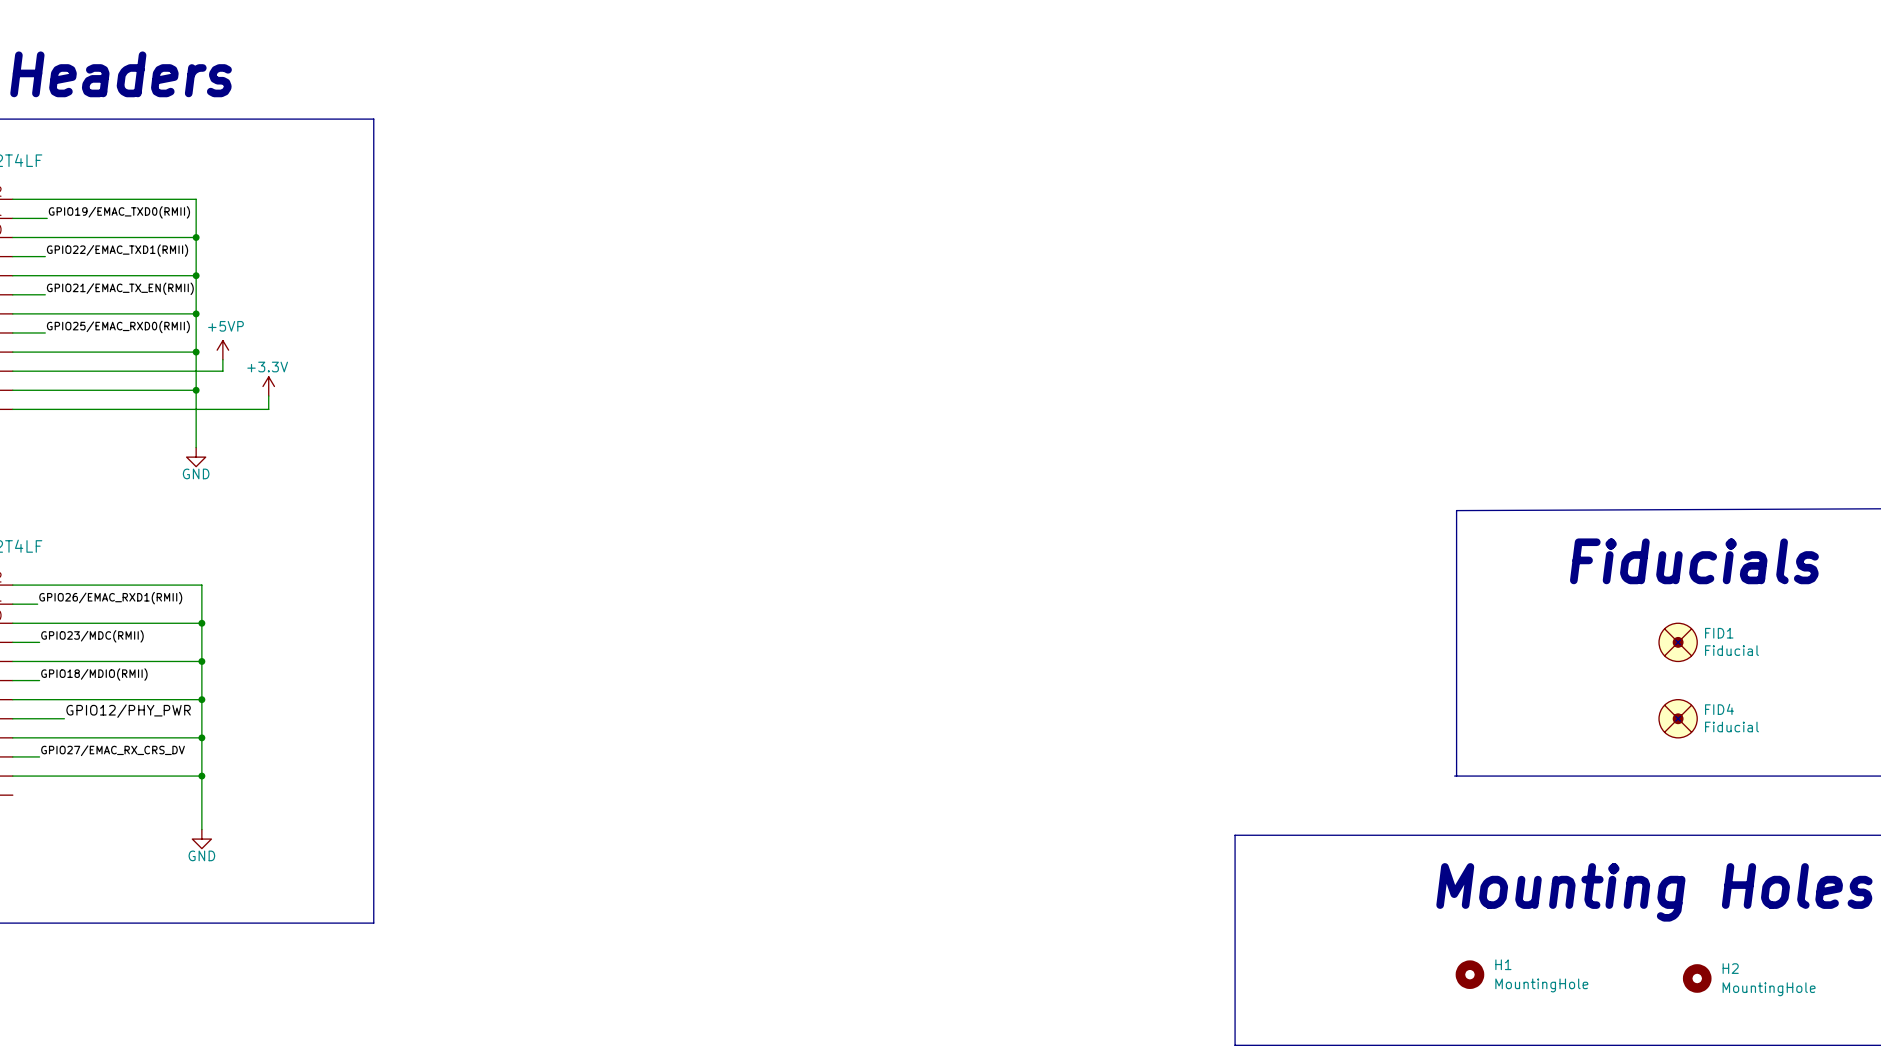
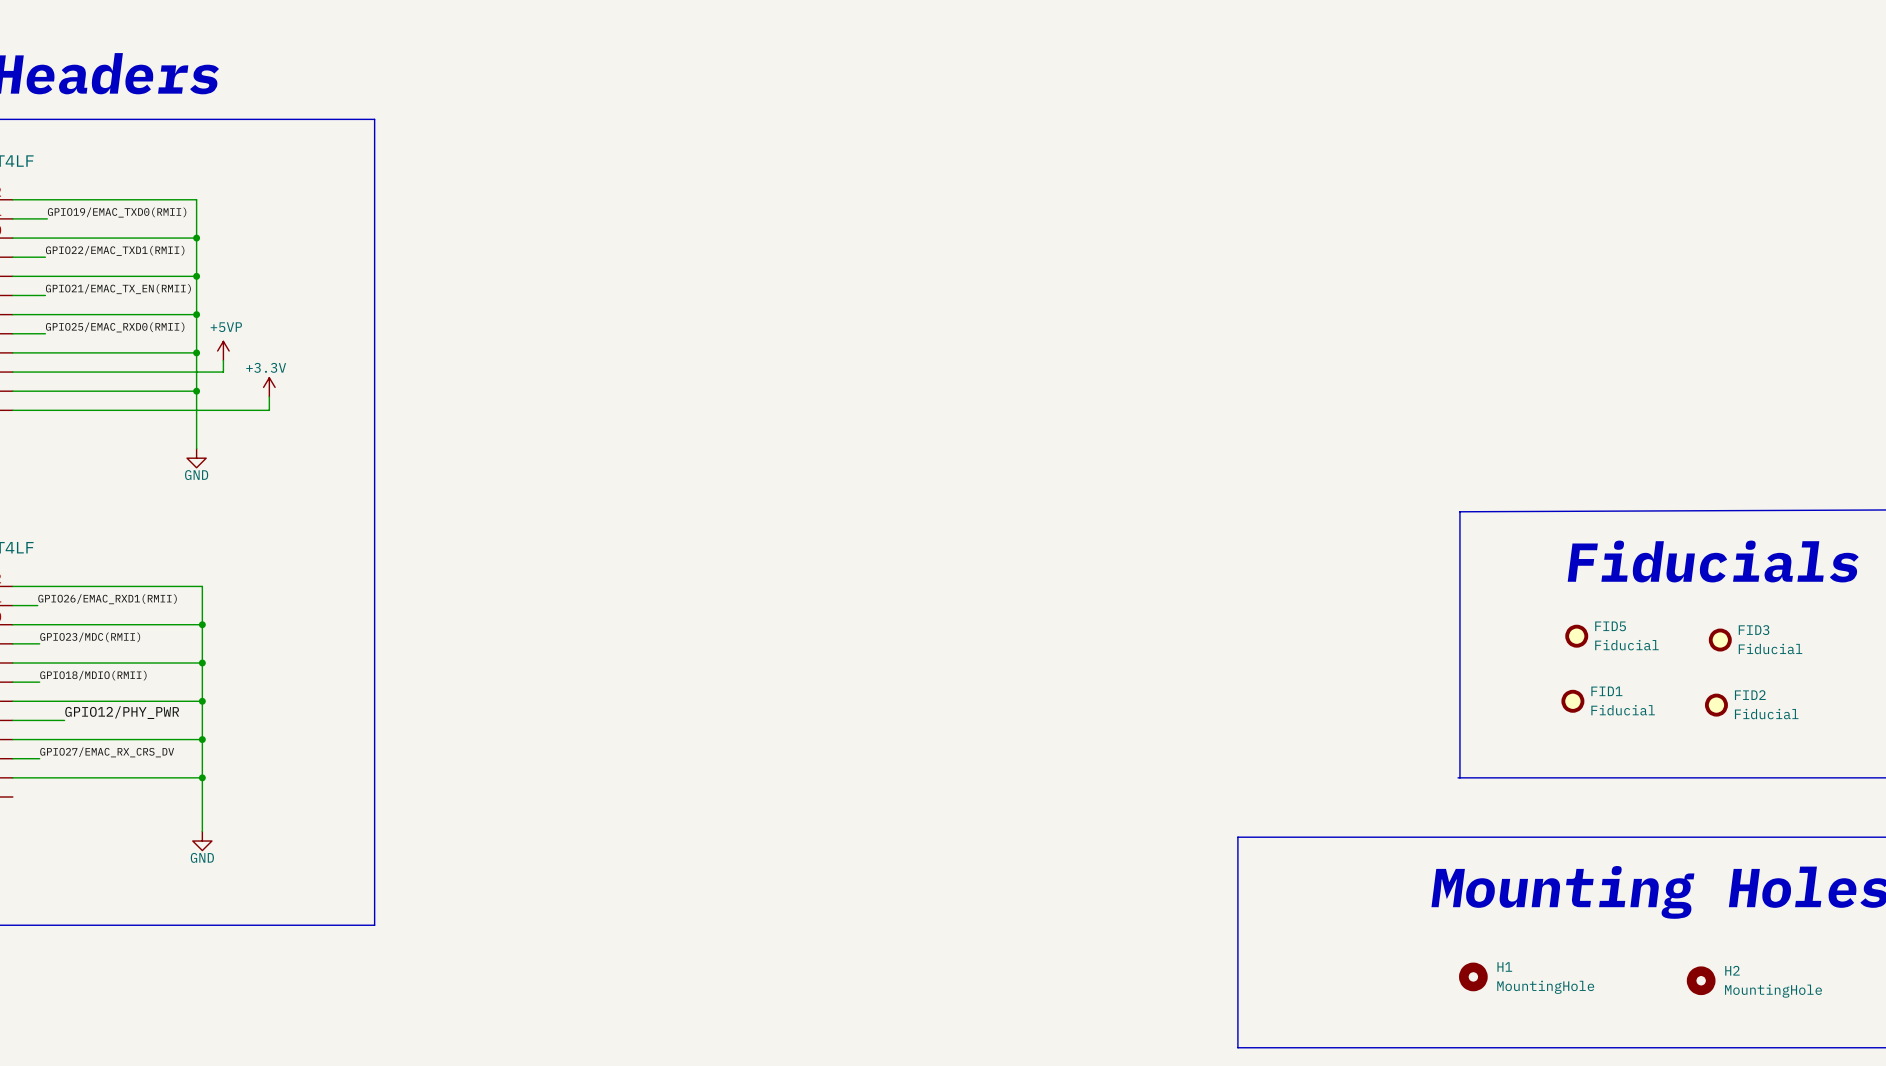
FID1 symbol: [1659, 623, 1698, 662] -> [1561, 689, 1585, 713]
FID5: none -> Fiducial (1576, 636)
FID3: none -> Fiducial (1720, 640)
FID2: none -> Fiducial (1716, 705)
FID4: Fiducial (1678, 718) -> none

